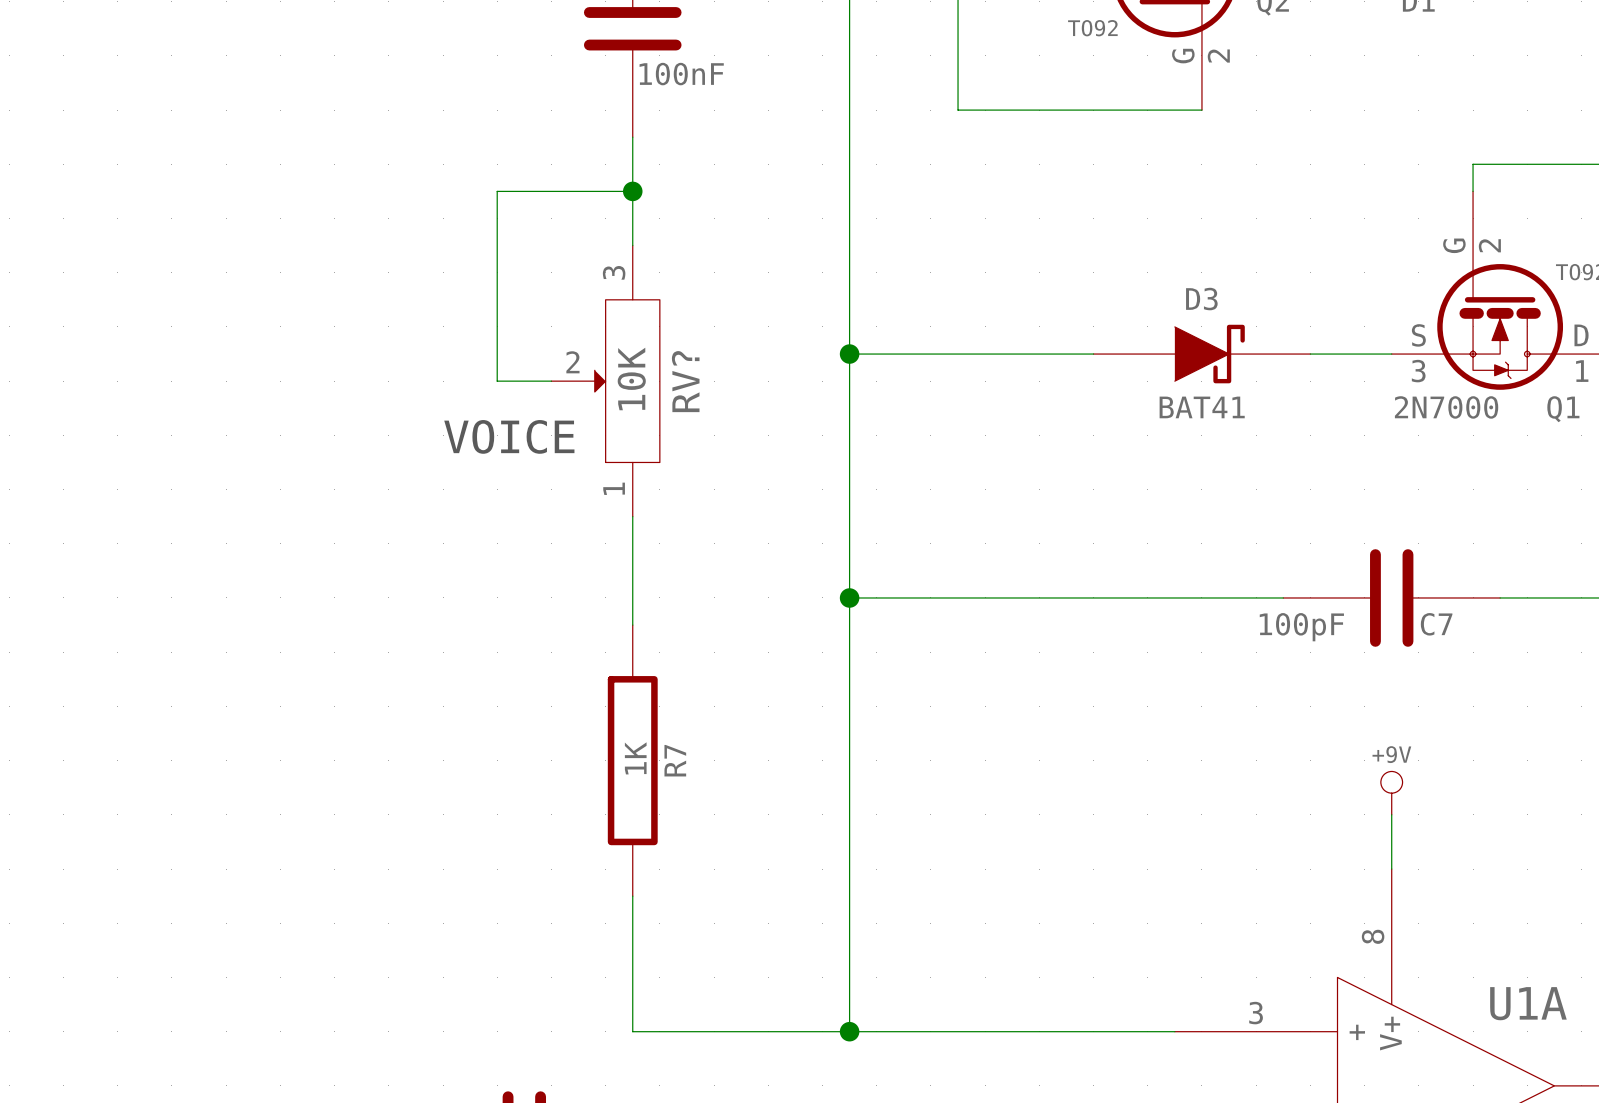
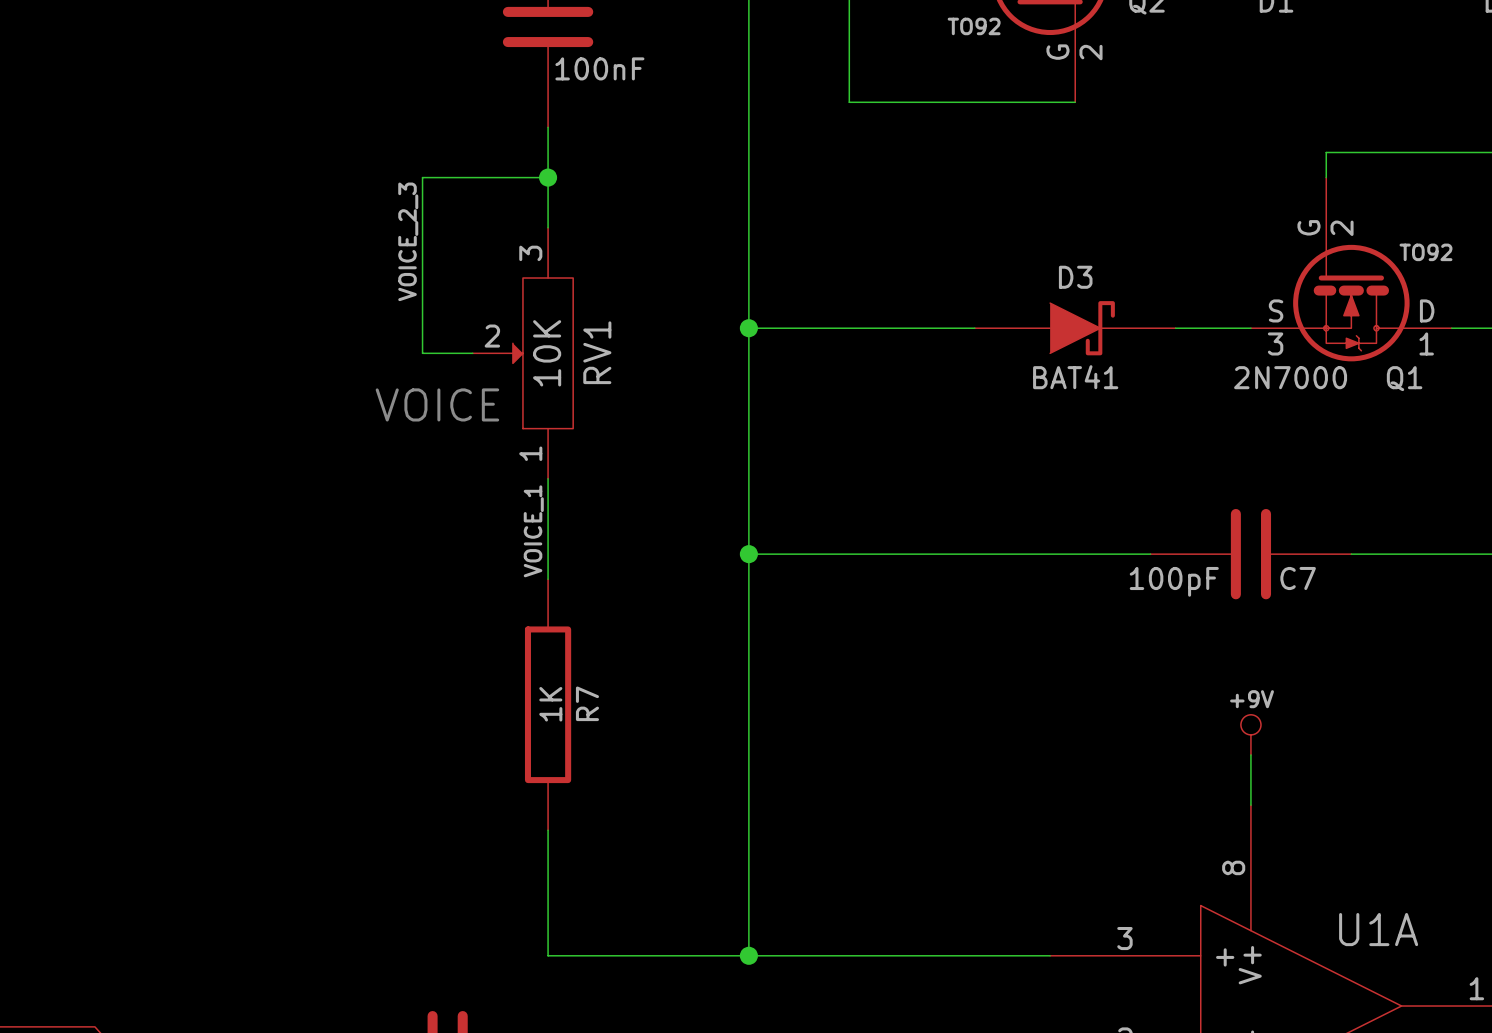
label: none -> VOICE_2_3 (408, 241)
RV? name: RV? (685, 381) -> RV1 (597, 352)
label: none -> VOICE_1 (533, 531)

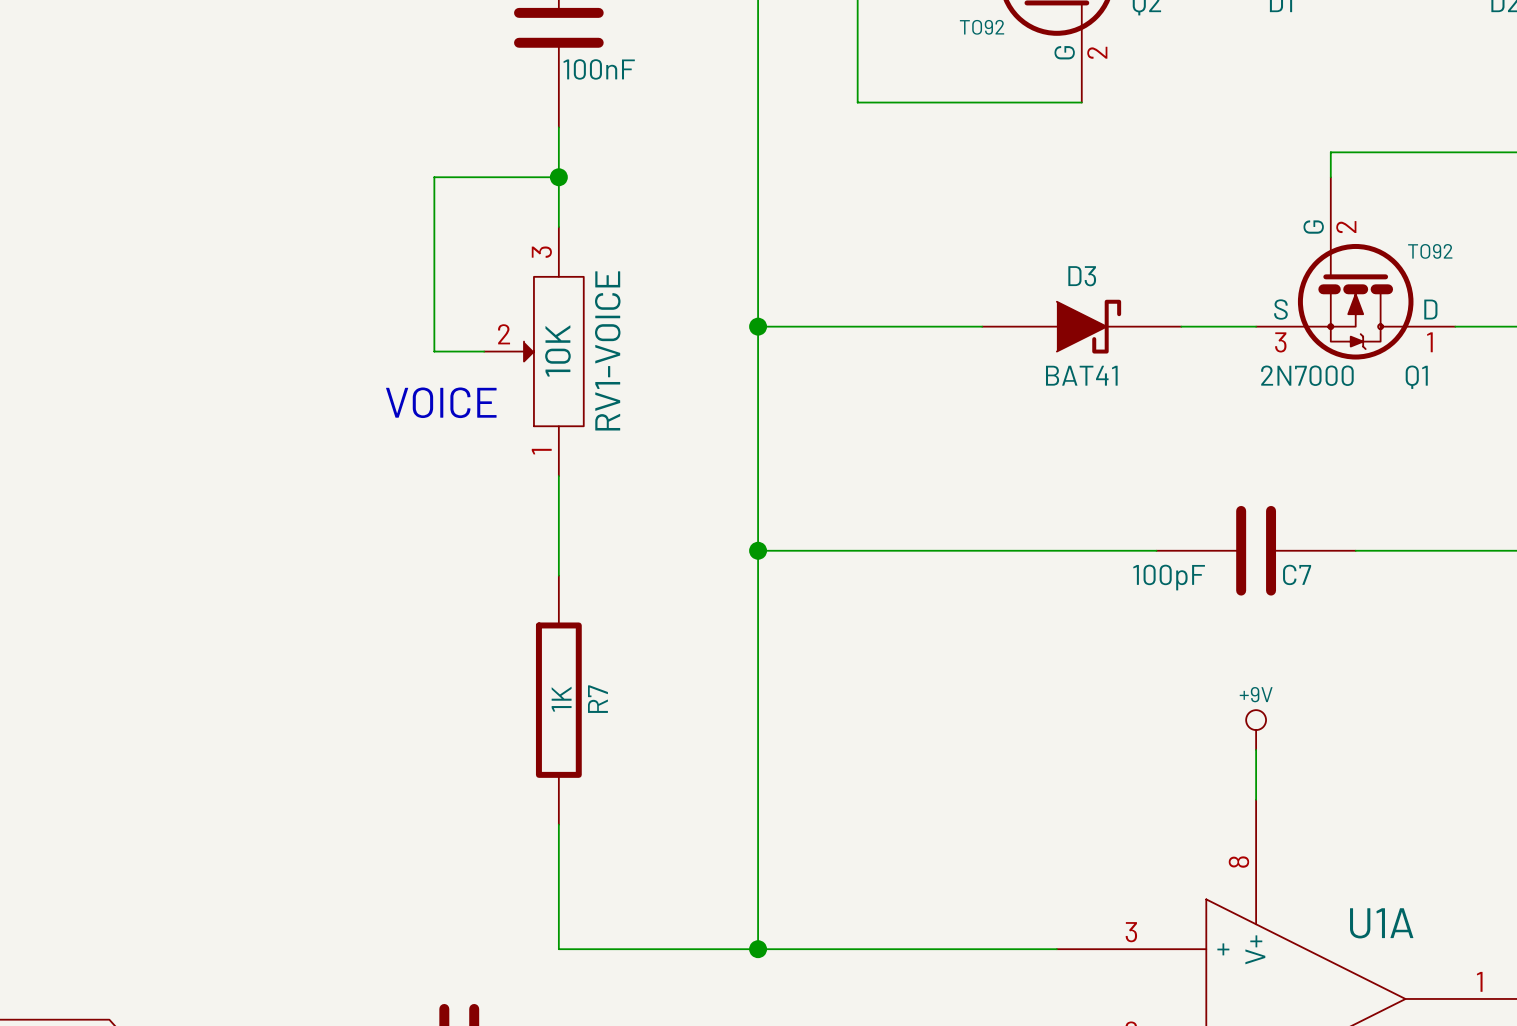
label: VOICE_2_3 (408, 241) -> none
RV1 name: RV1 (597, 352) -> RV1-VOICE (607, 350)
label: VOICE_1 (533, 531) -> none

